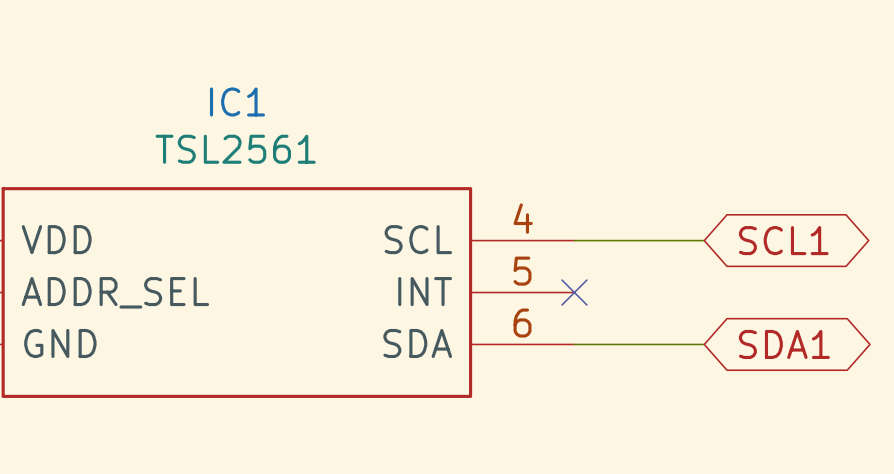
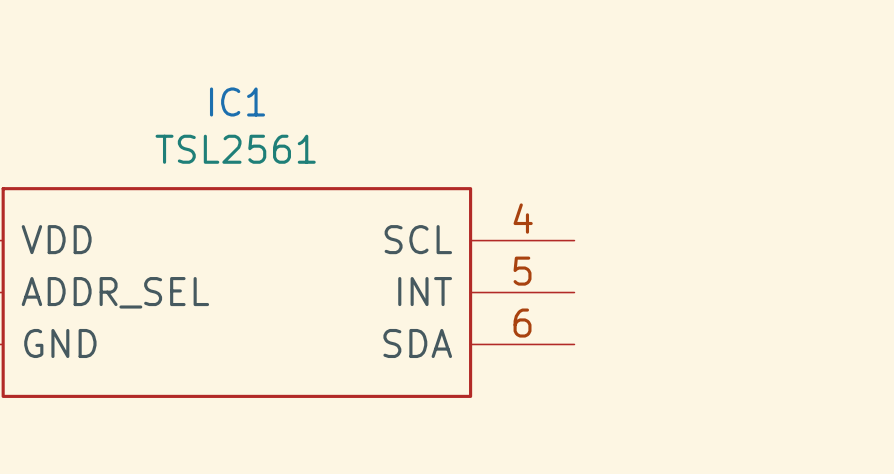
wire: (574, 240) (704, 240) -> none
global label: SCL1 (783, 240) -> none
no-connect mark: (574, 292) -> none
wire: (574, 344) (704, 344) -> none
global label: SDA1 (784, 344) -> none

